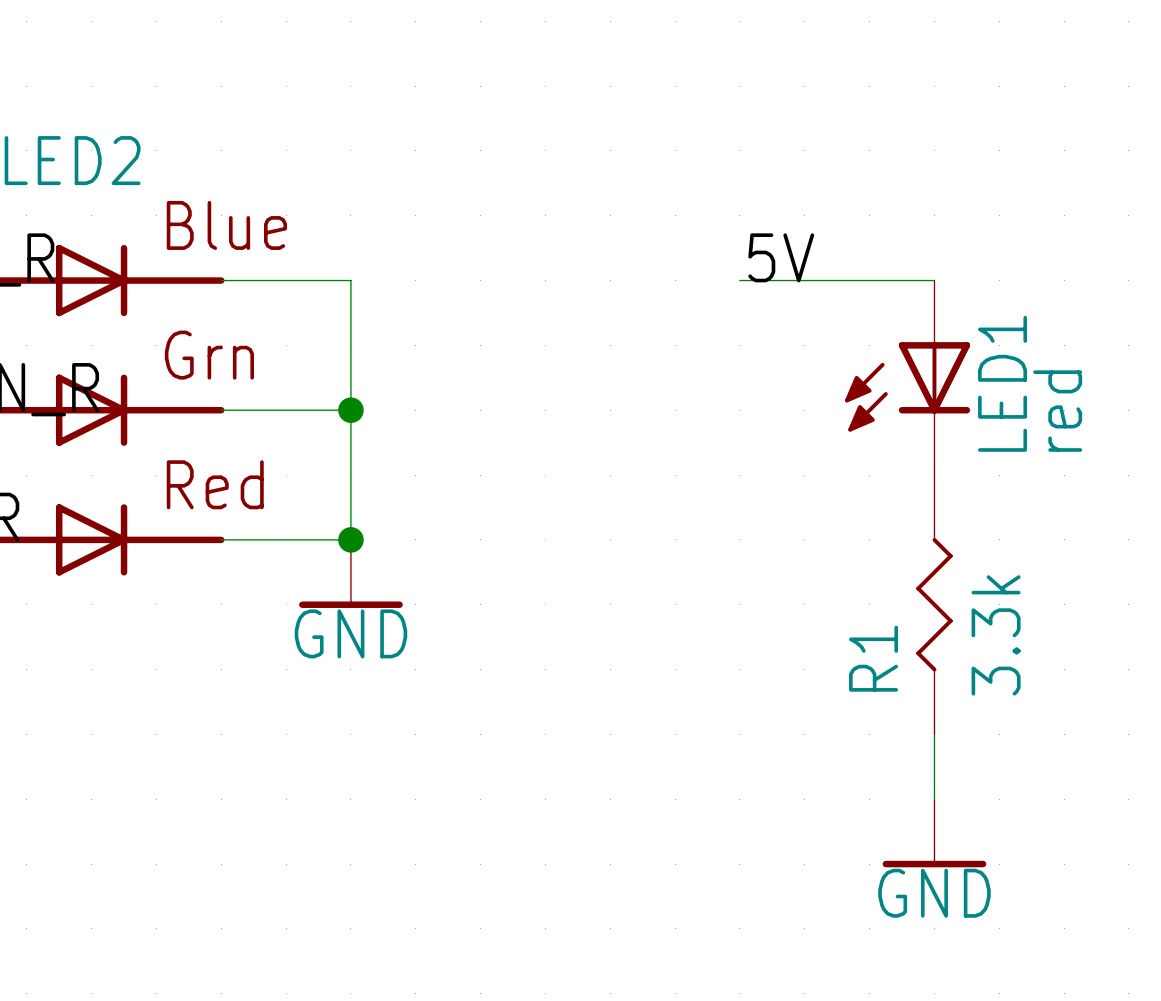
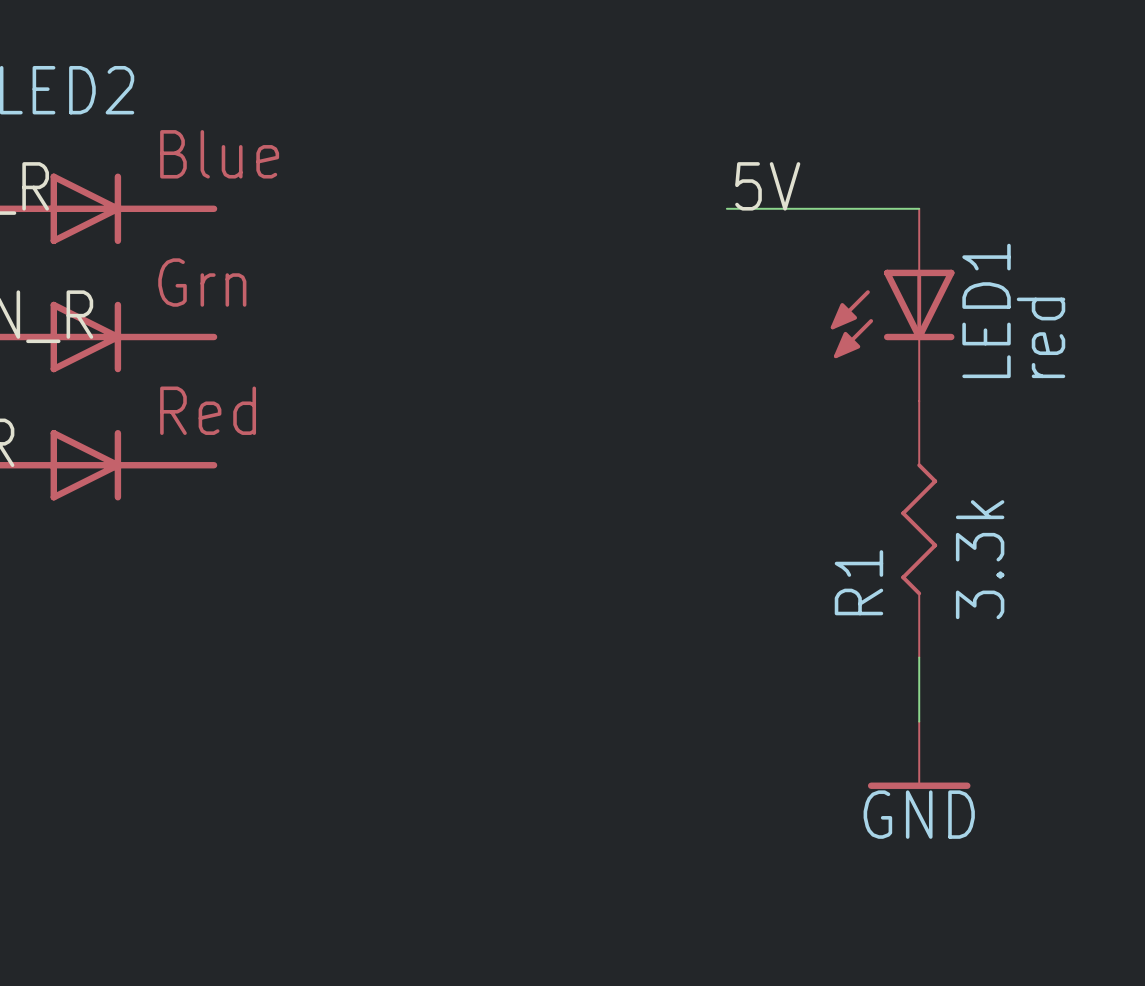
wire: (221, 280) (350, 280) (350, 539) (221, 539) -> none
wire: (221, 410) (350, 410) -> none
junction: (350, 410) -> none
junction: (350, 539) -> none
power symbol: GND (350, 573) -> none

